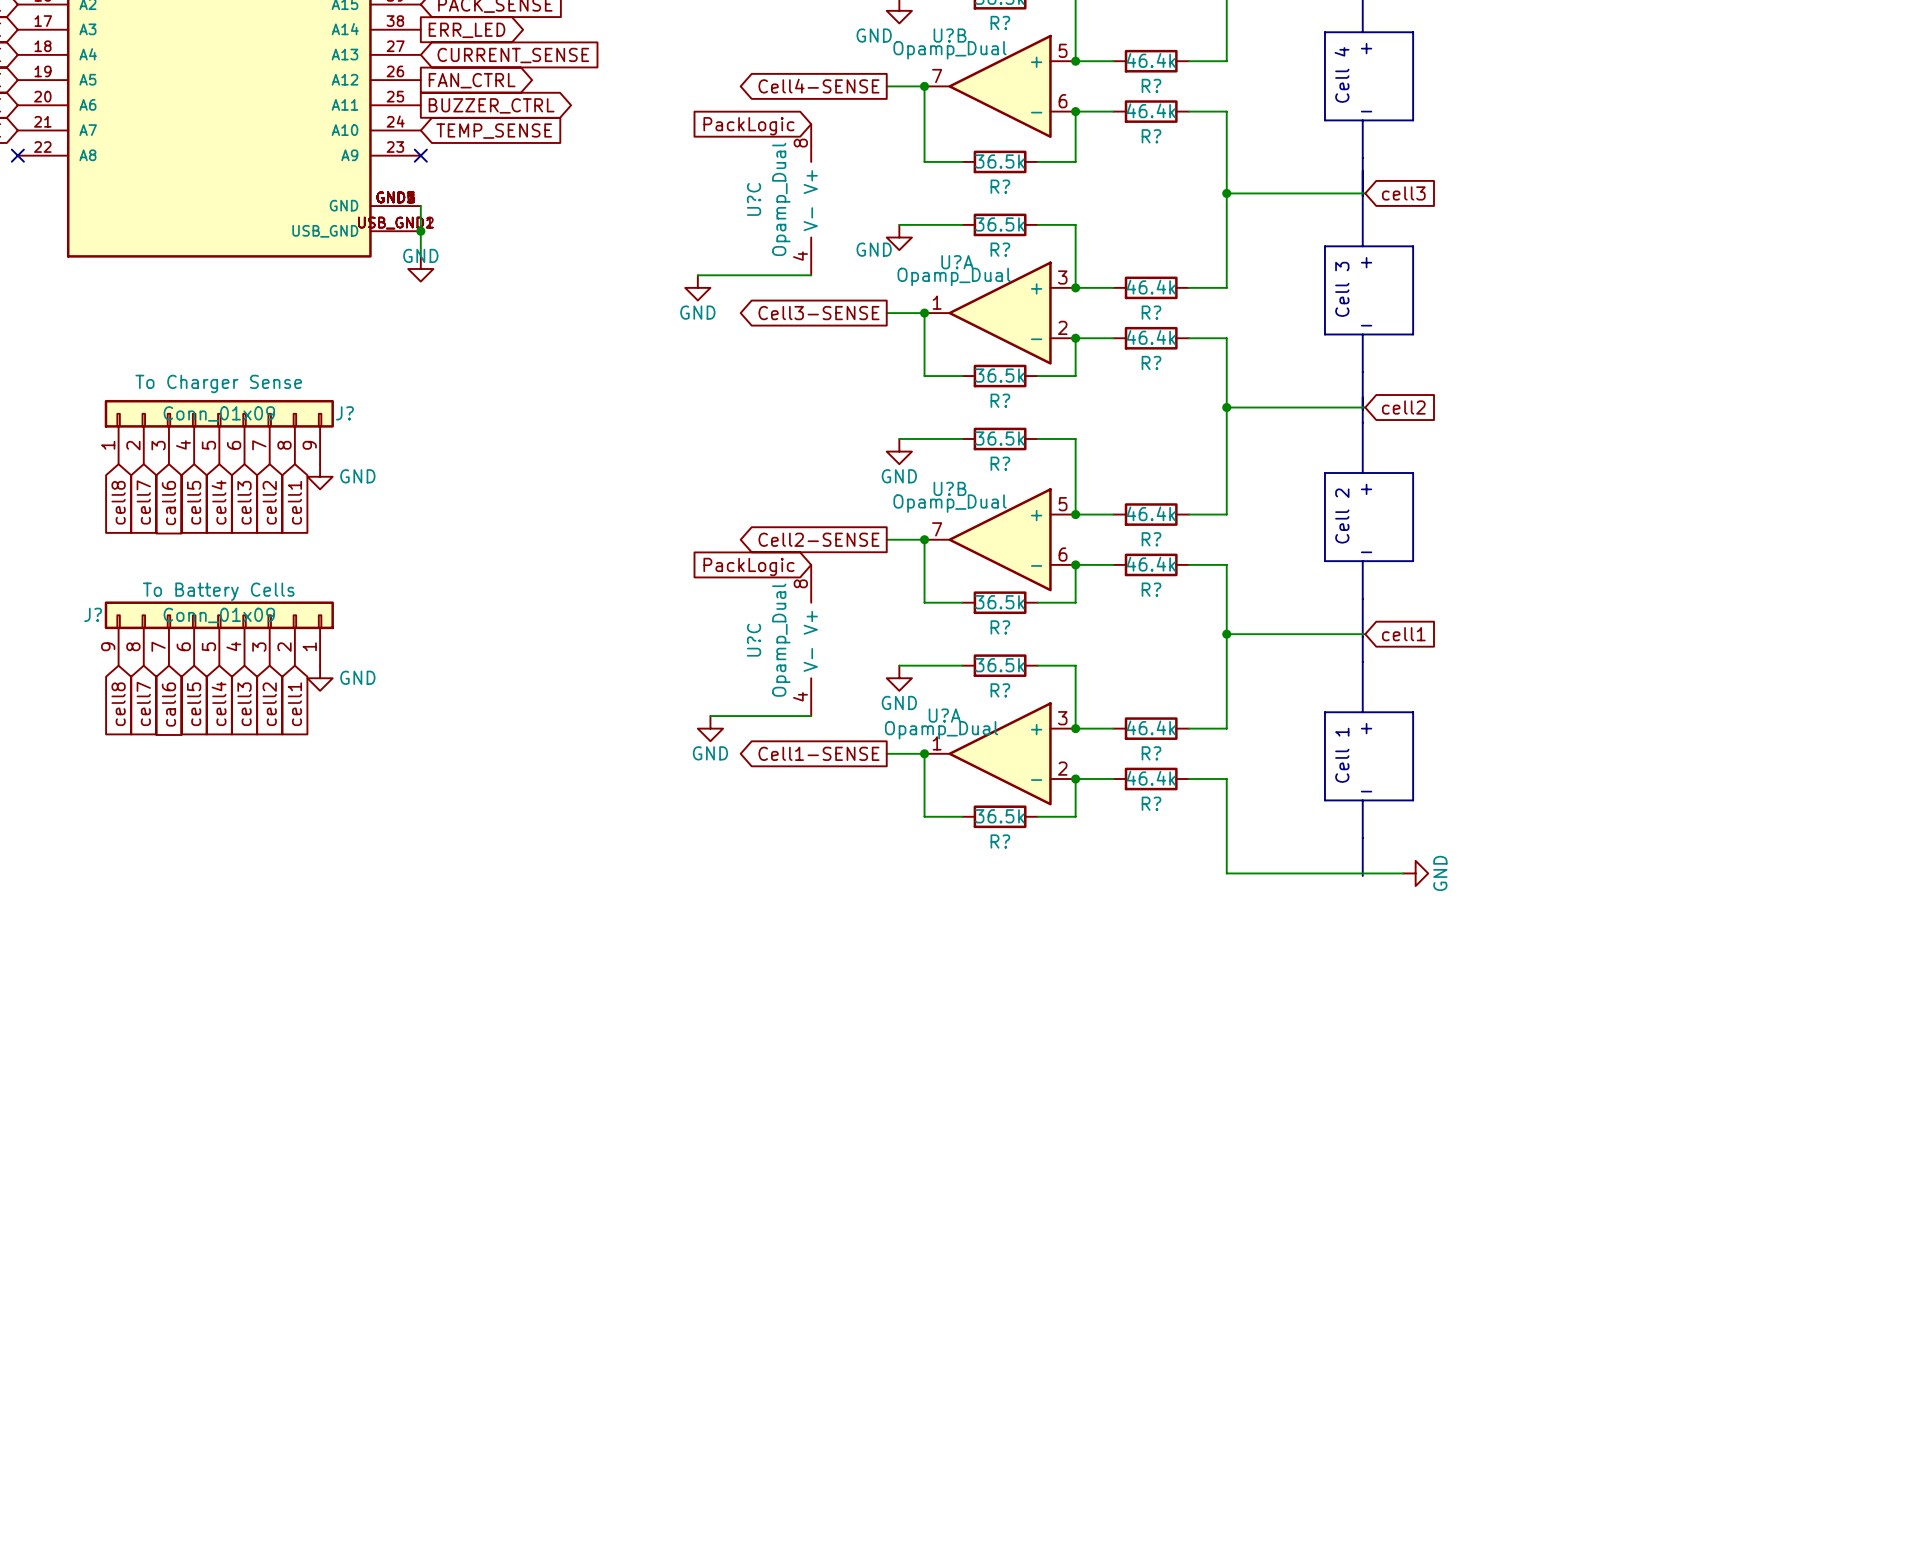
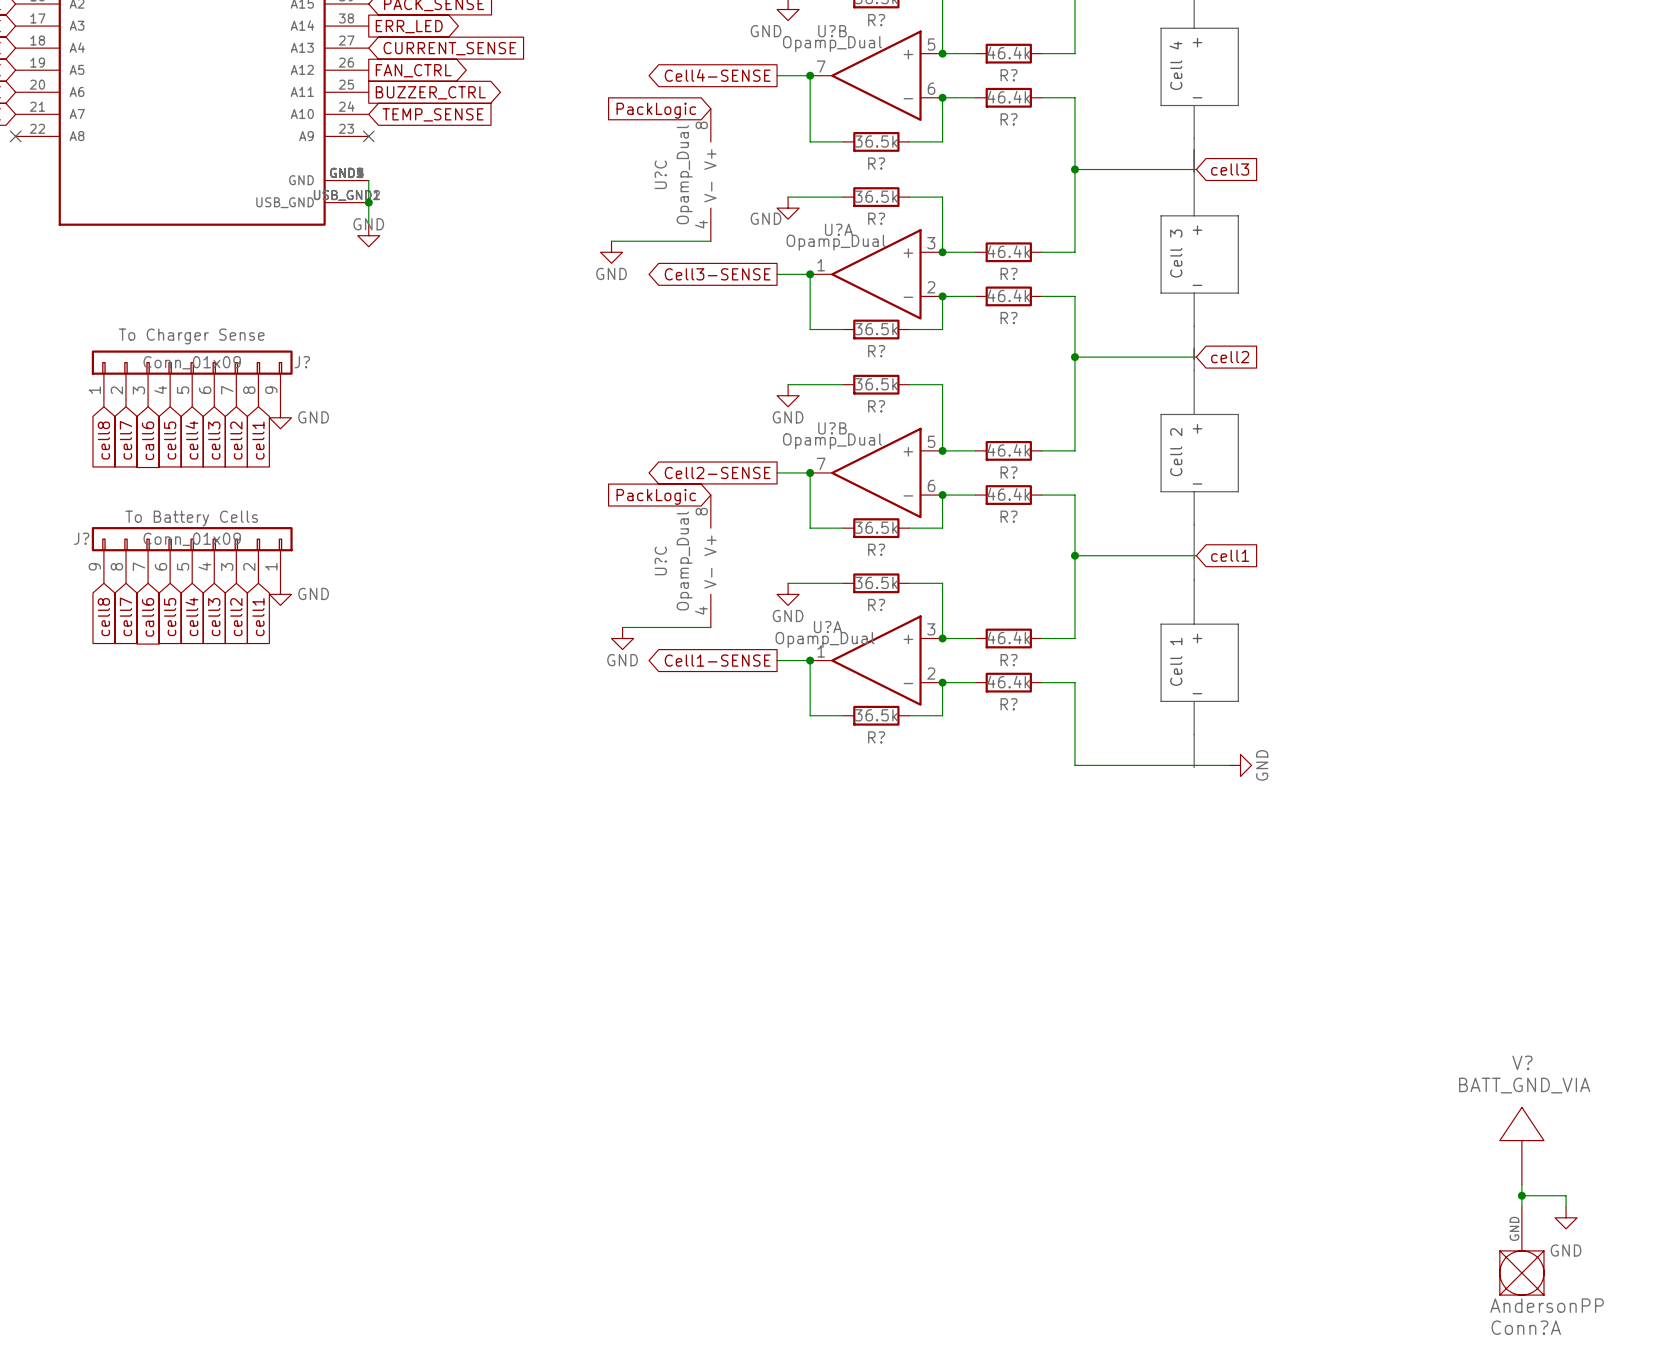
V?: none -> BATT_GND_VIA (1521, 1146)
wire: none -> (1521, 1184) (1521, 1206)
wire: none -> (1521, 1195) (1566, 1195) (1566, 1206)
junction: none -> (1521, 1195)
power symbol: none -> GND (1566, 1217)
Conn?A: none -> AndersonPP (1521, 1250)

